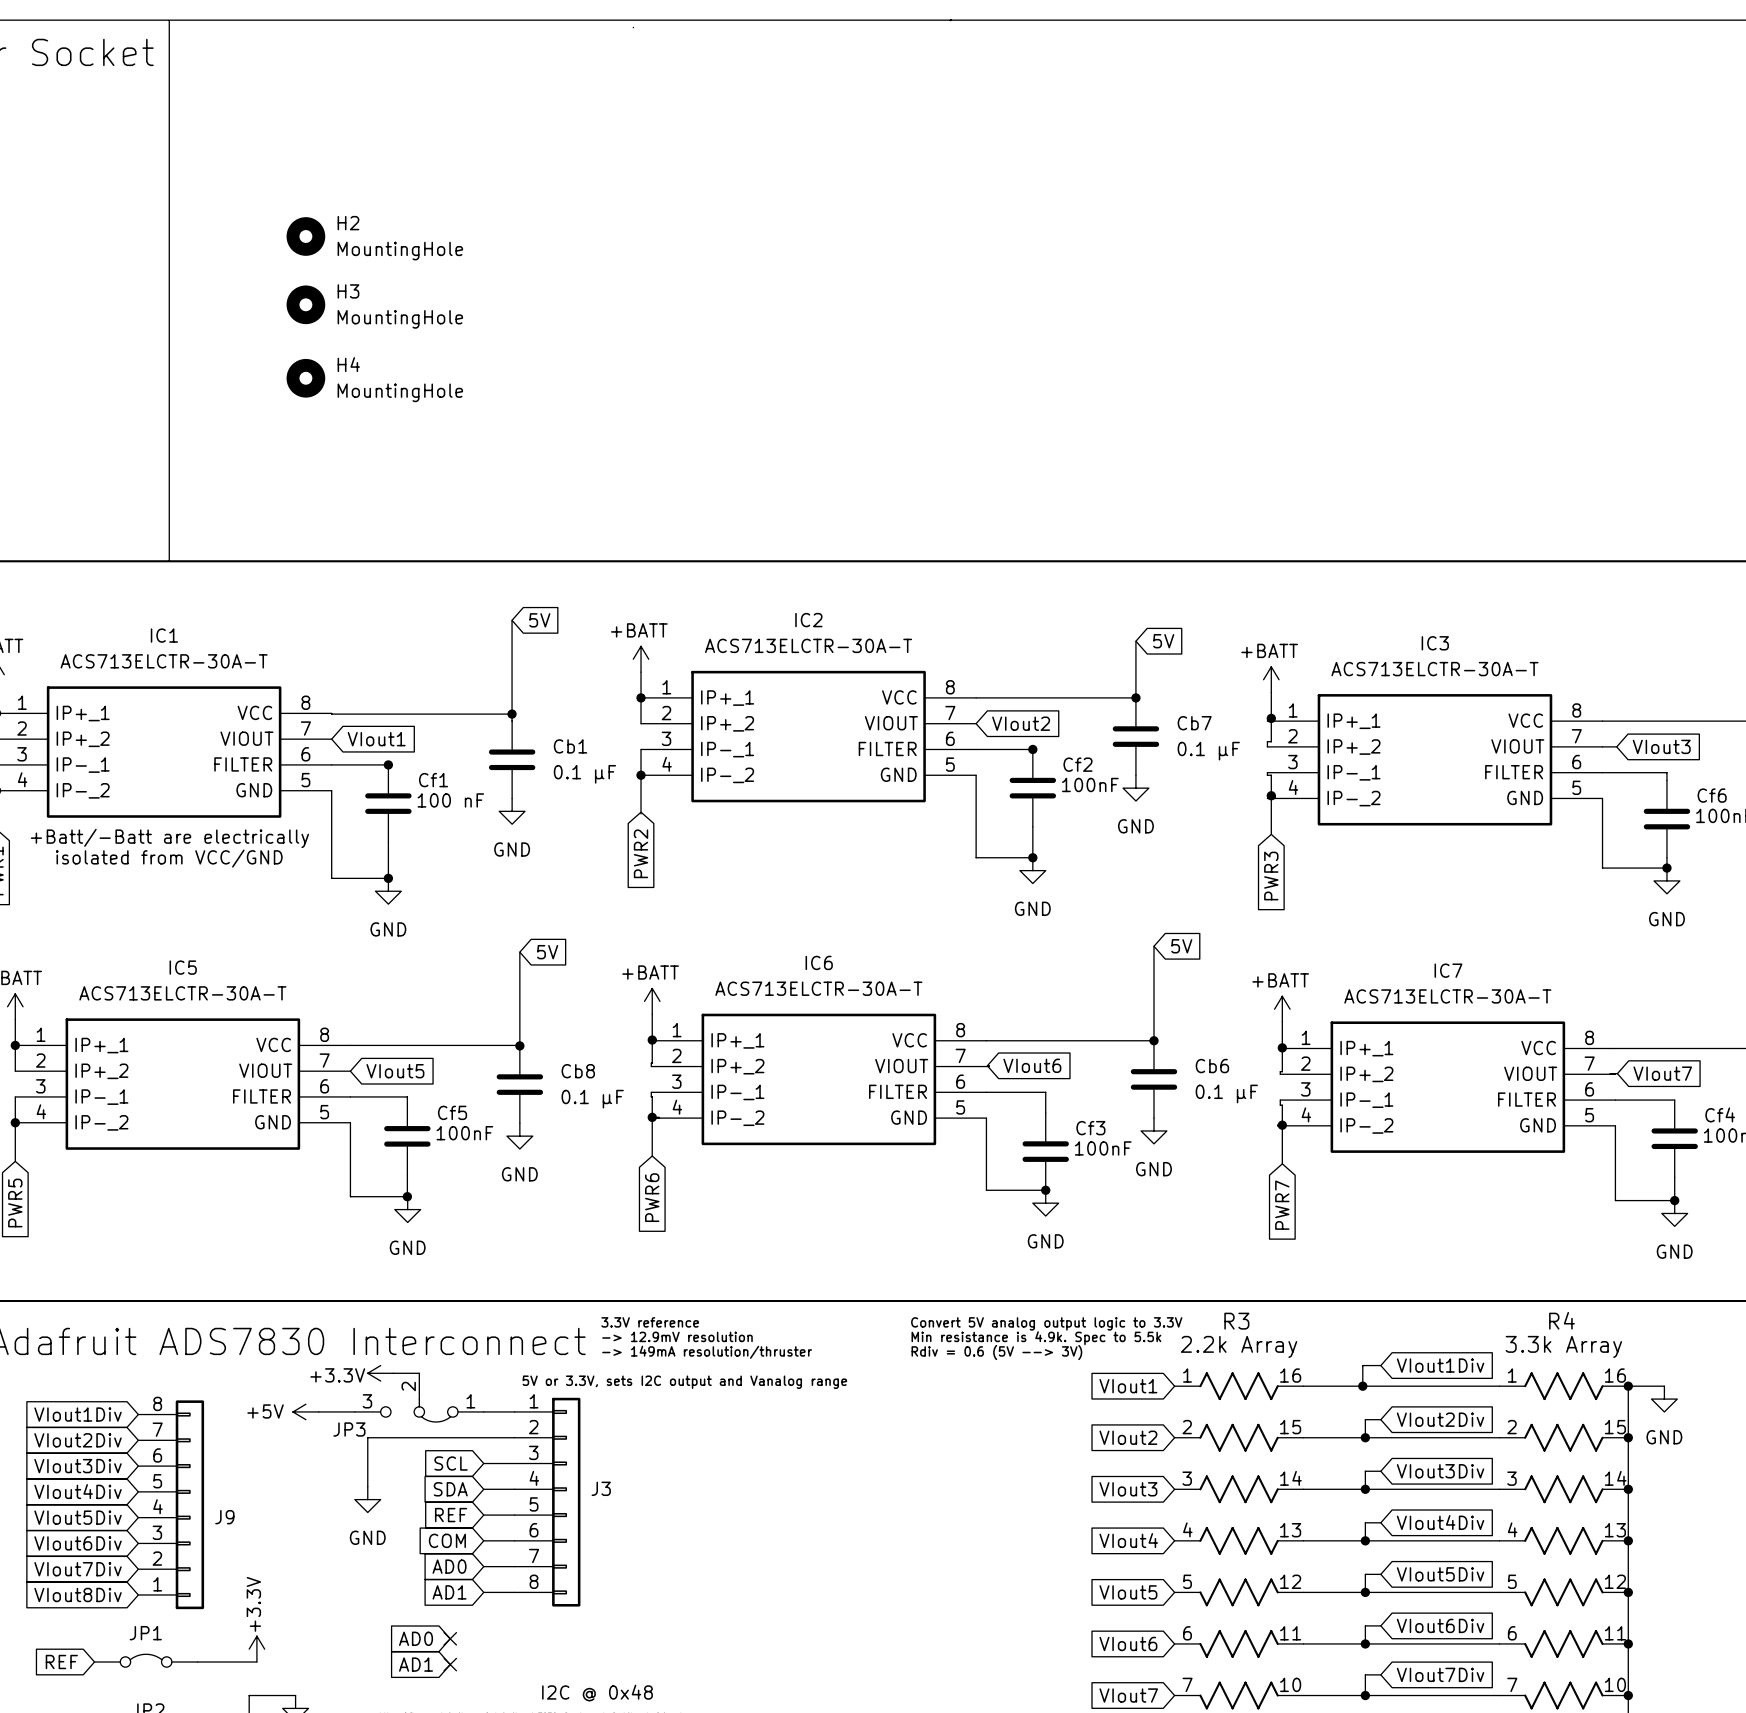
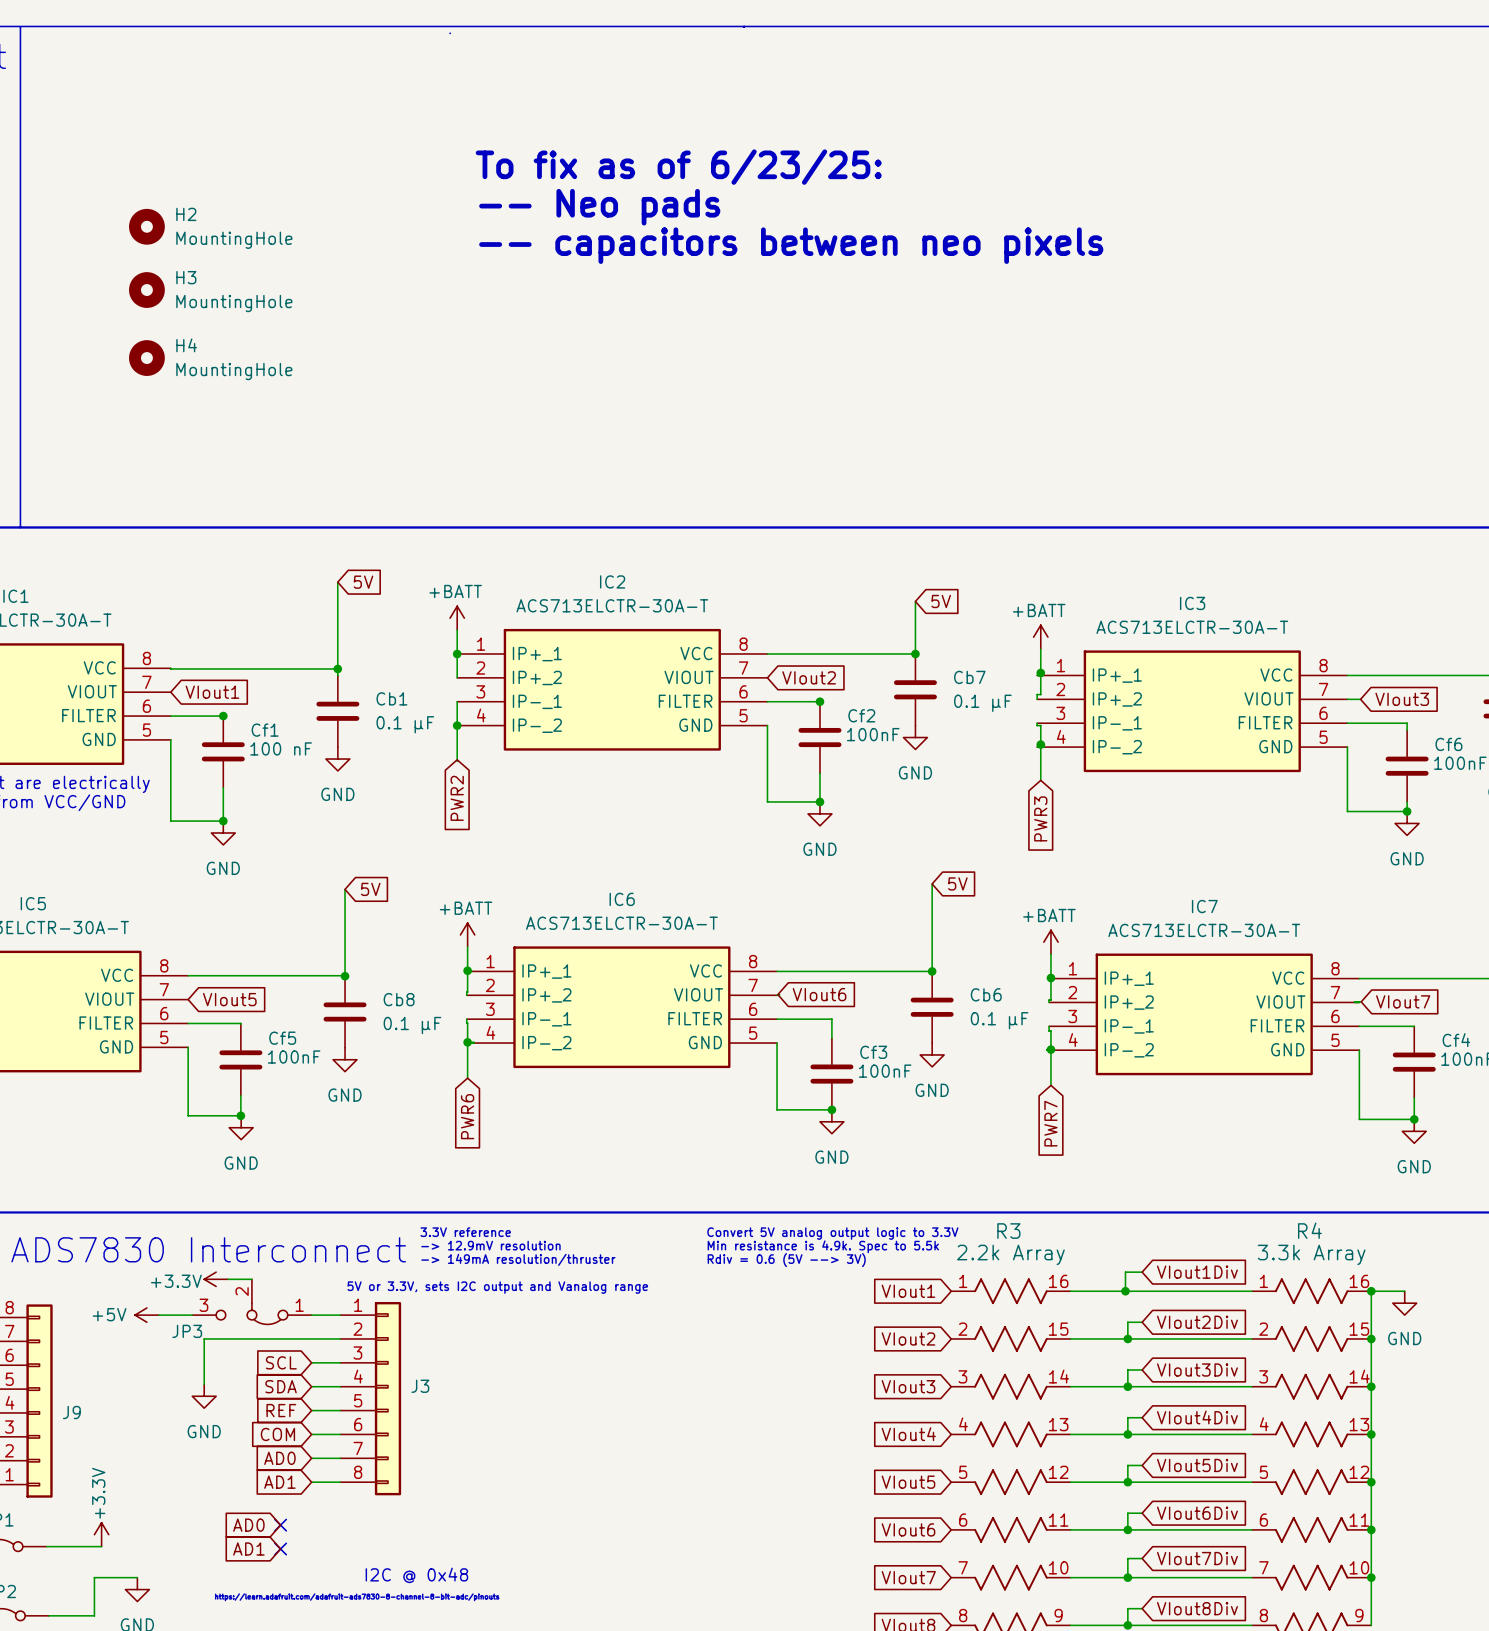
text: none -> To fix as of 6/23/25: (678, 167)
text: none -> -- Neo pads (599, 207)
text: none -> -- capacitors between neo pixels (791, 245)

